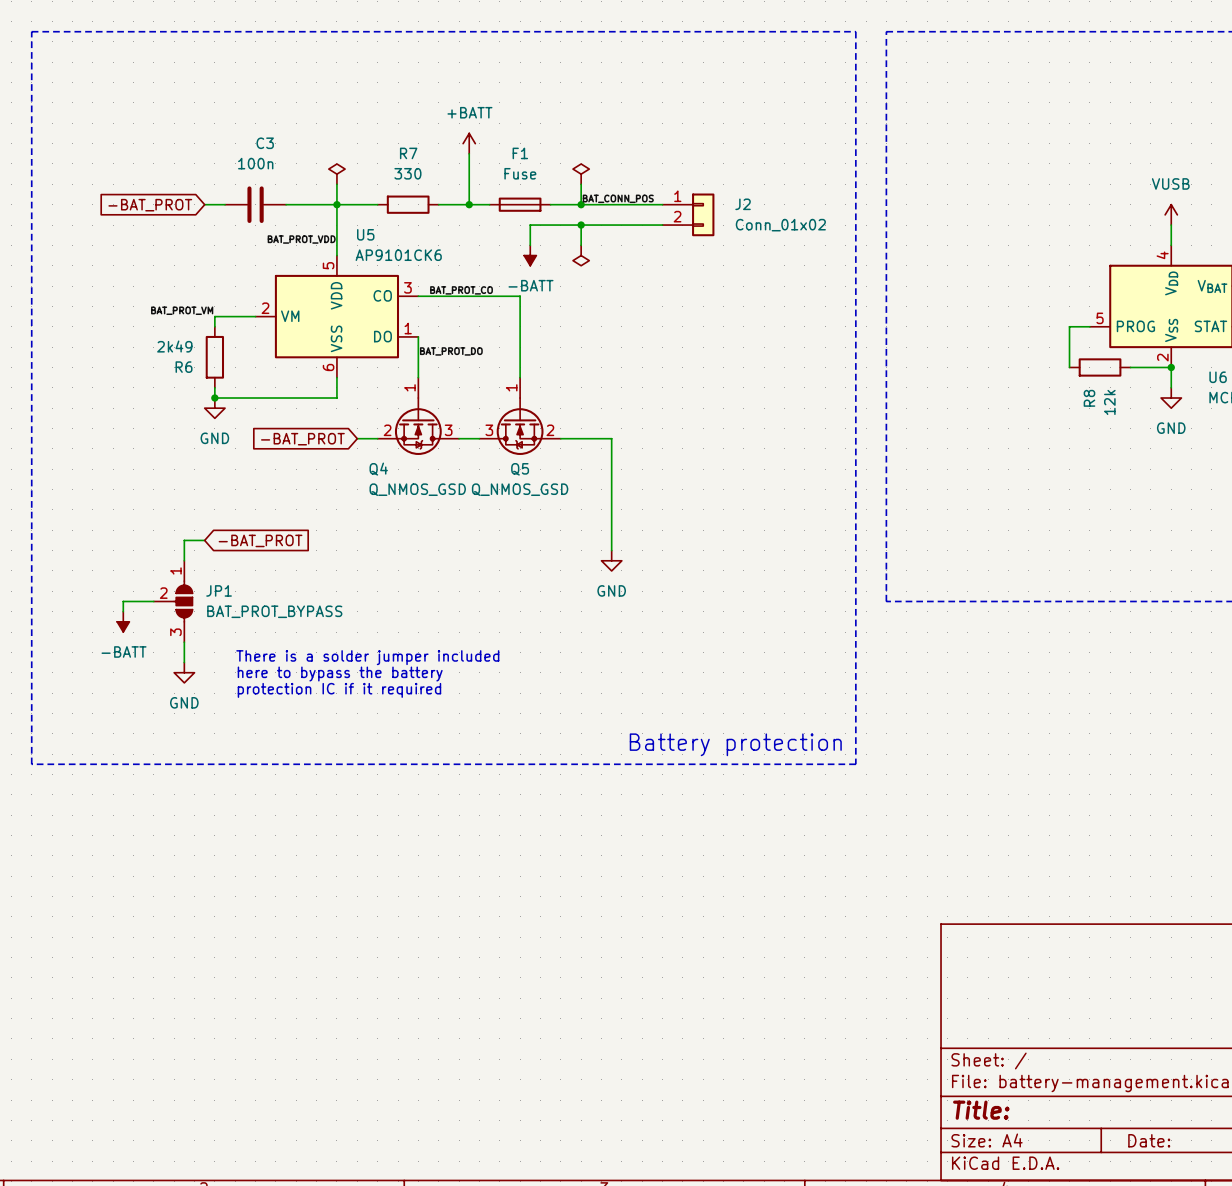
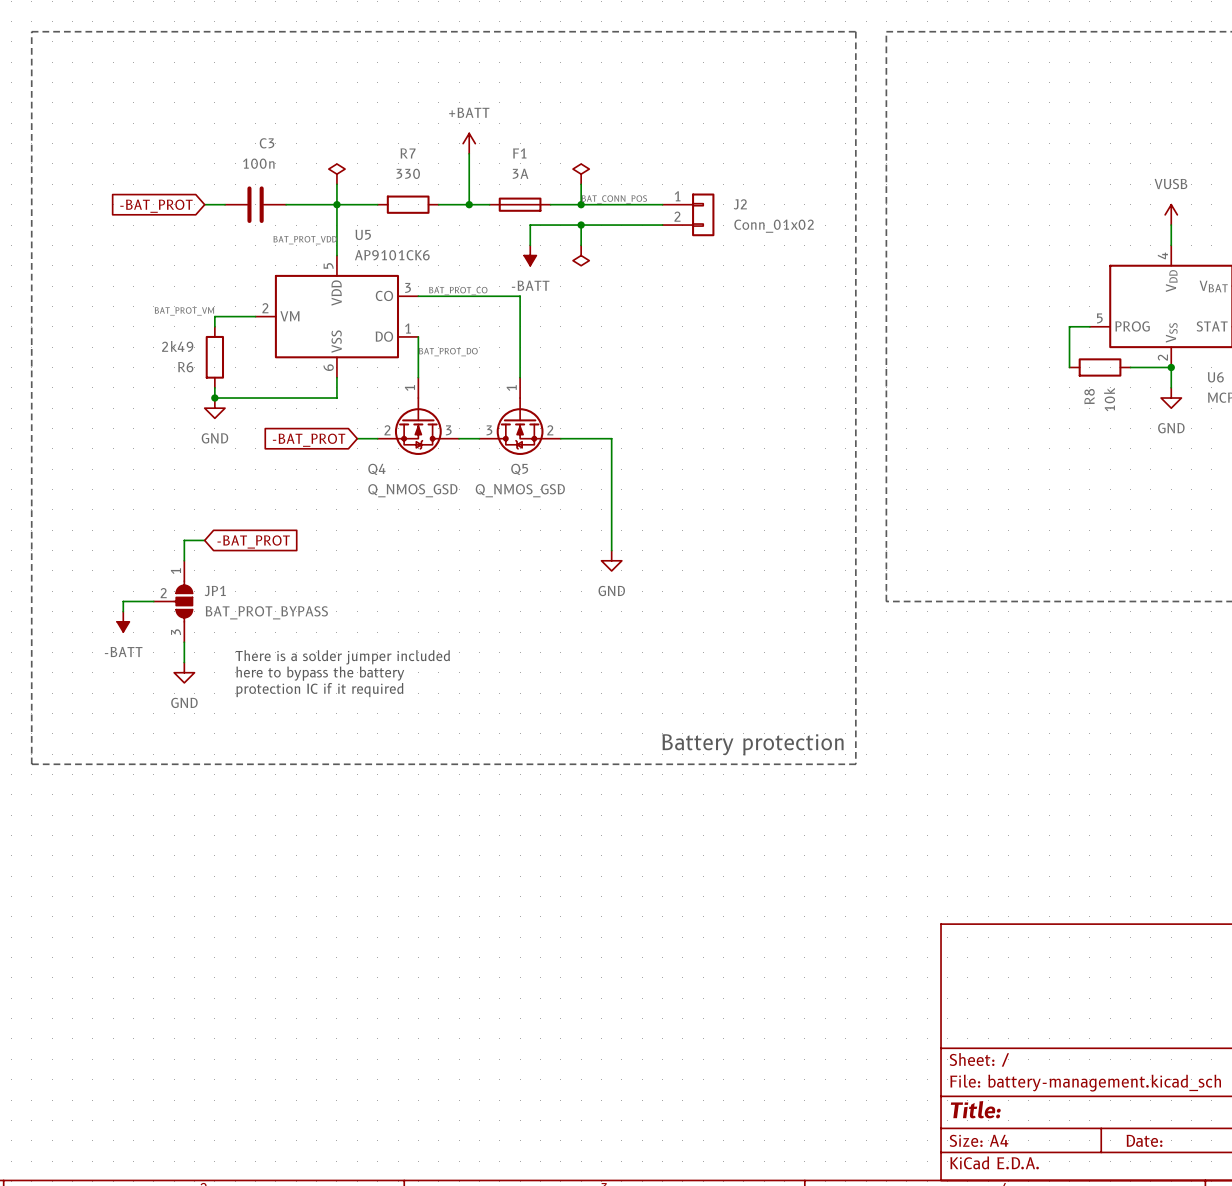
F1 value: Fuse (520, 173) -> 3A (520, 173)
R8 value: 12k (1109, 402) -> 10k (1109, 399)

